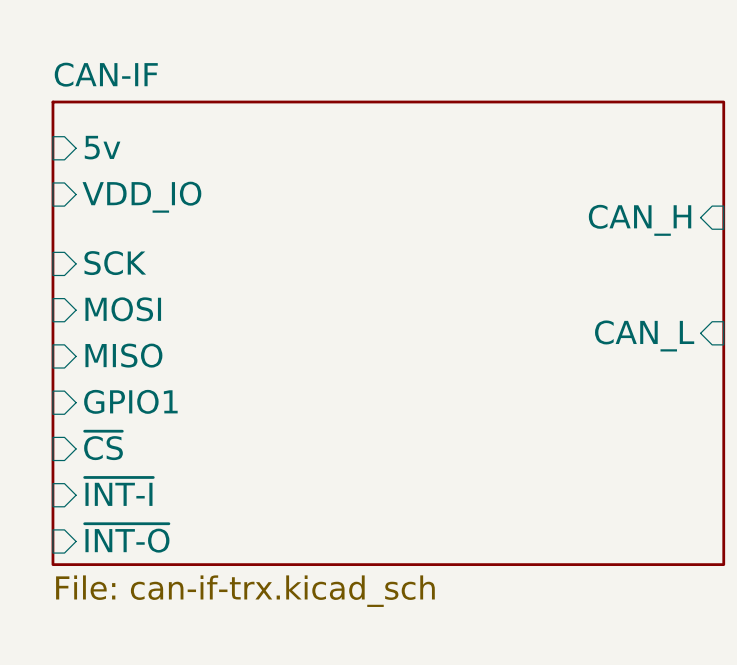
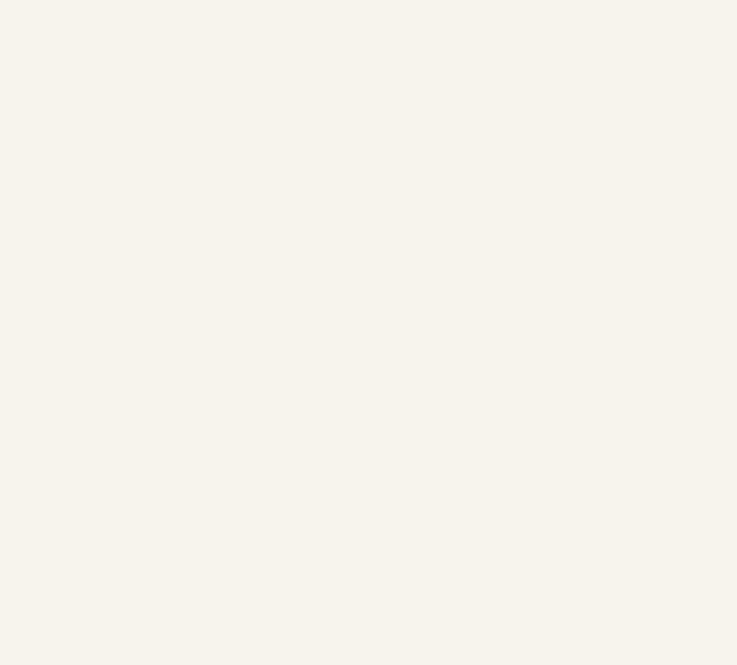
sheet pin: 5v (102, 147) -> none
sheet pin: VDD_IO (141, 197) -> none
sheet pin: CAN_H (640, 220) -> none
sheet pin: SCK (115, 263) -> none
sheet pin: MOSI (123, 309) -> none
sheet CAN-IF: File: can-if-trx.kicad_sch (388, 333) -> none
sheet pin: CAN_L (644, 335) -> none
sheet pin: MISO (123, 355) -> none
sheet pin: GPIO1 (130, 401) -> none
sheet pin: ~{CS} (103, 445) -> none
sheet pin: ~{INT-I} (118, 491) -> none
sheet pin: ~{INT-O} (127, 538) -> none

